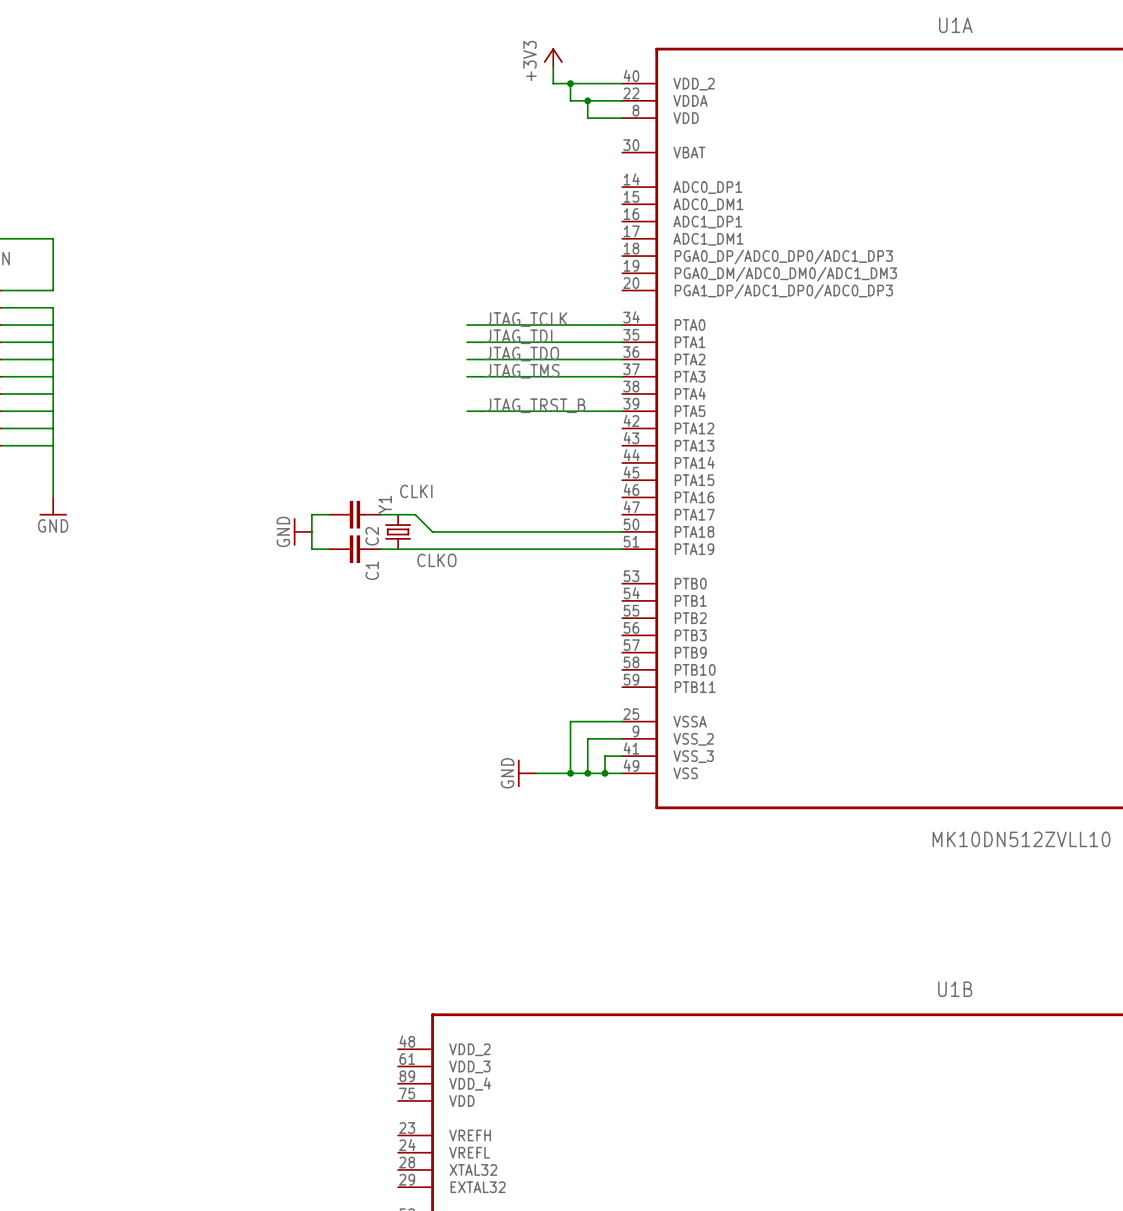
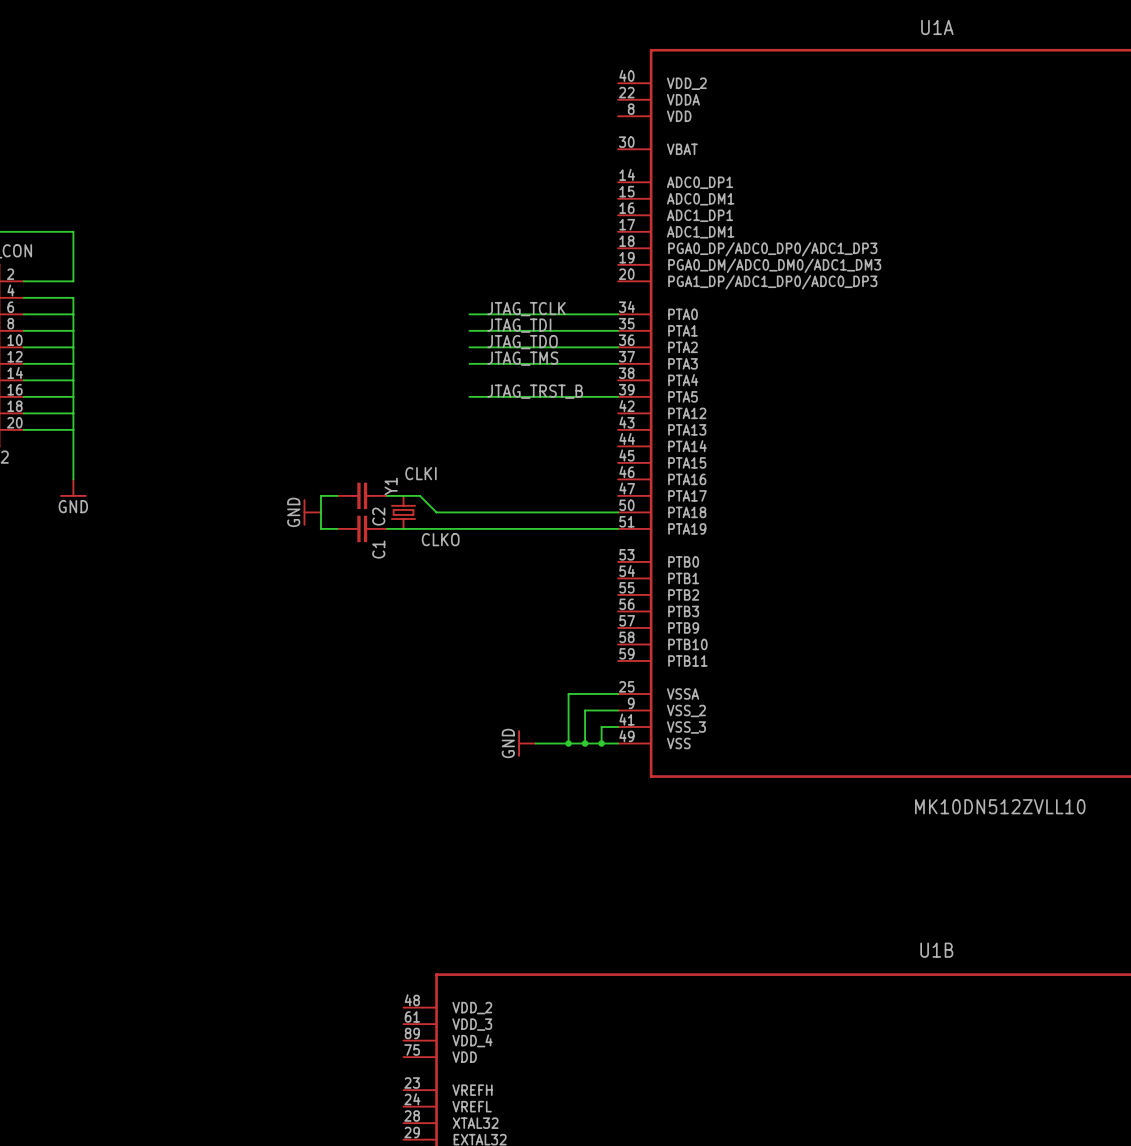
power symbol: +3V3 (553, 57) -> none
wire: (553, 66) (553, 83) (622, 83) -> none
wire: (570, 83) (570, 100) (622, 100) -> none
junction: (570, 83) -> none
wire: (587, 100) (587, 118) (622, 118) -> none
junction: (587, 100) -> none

